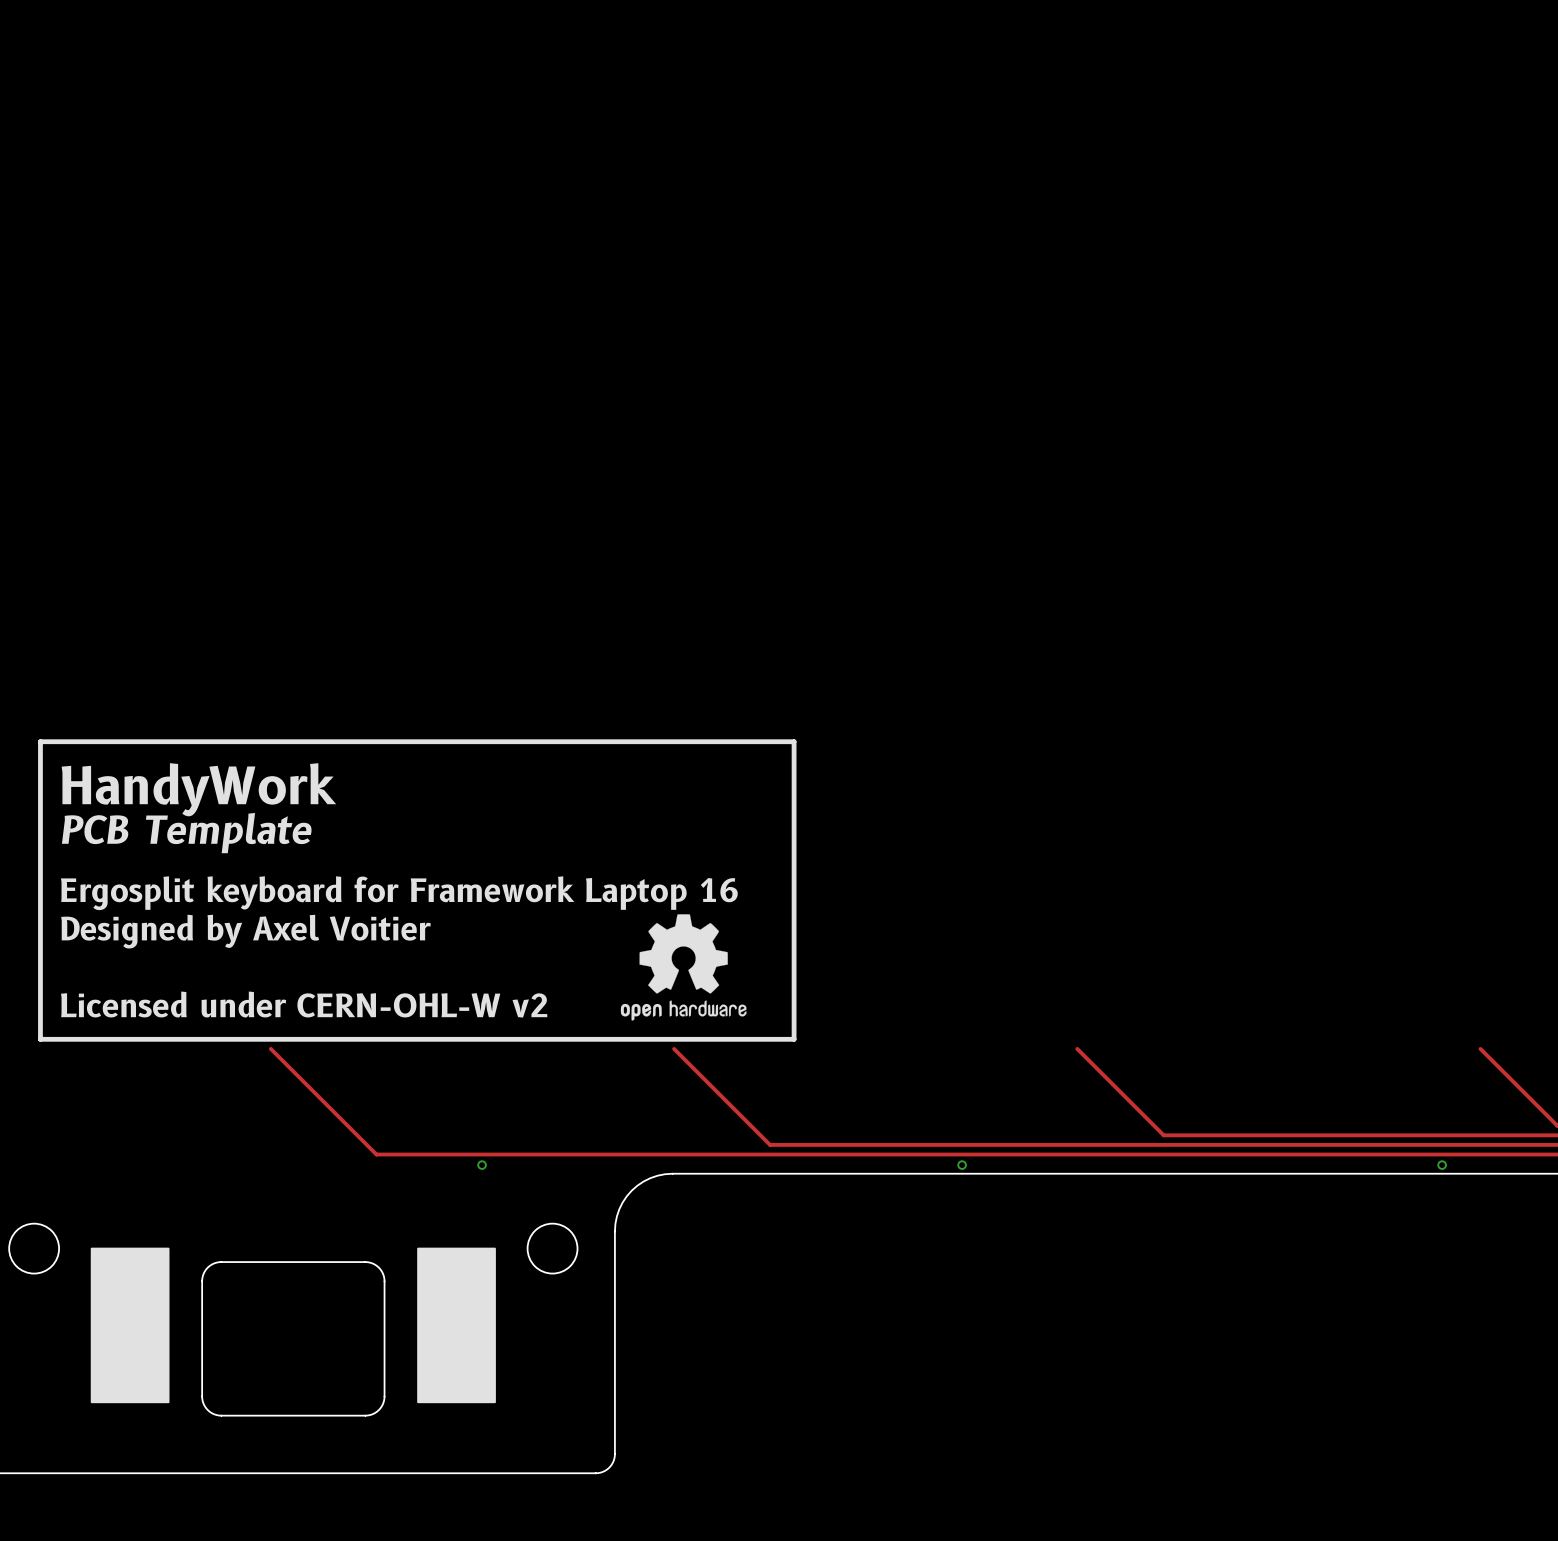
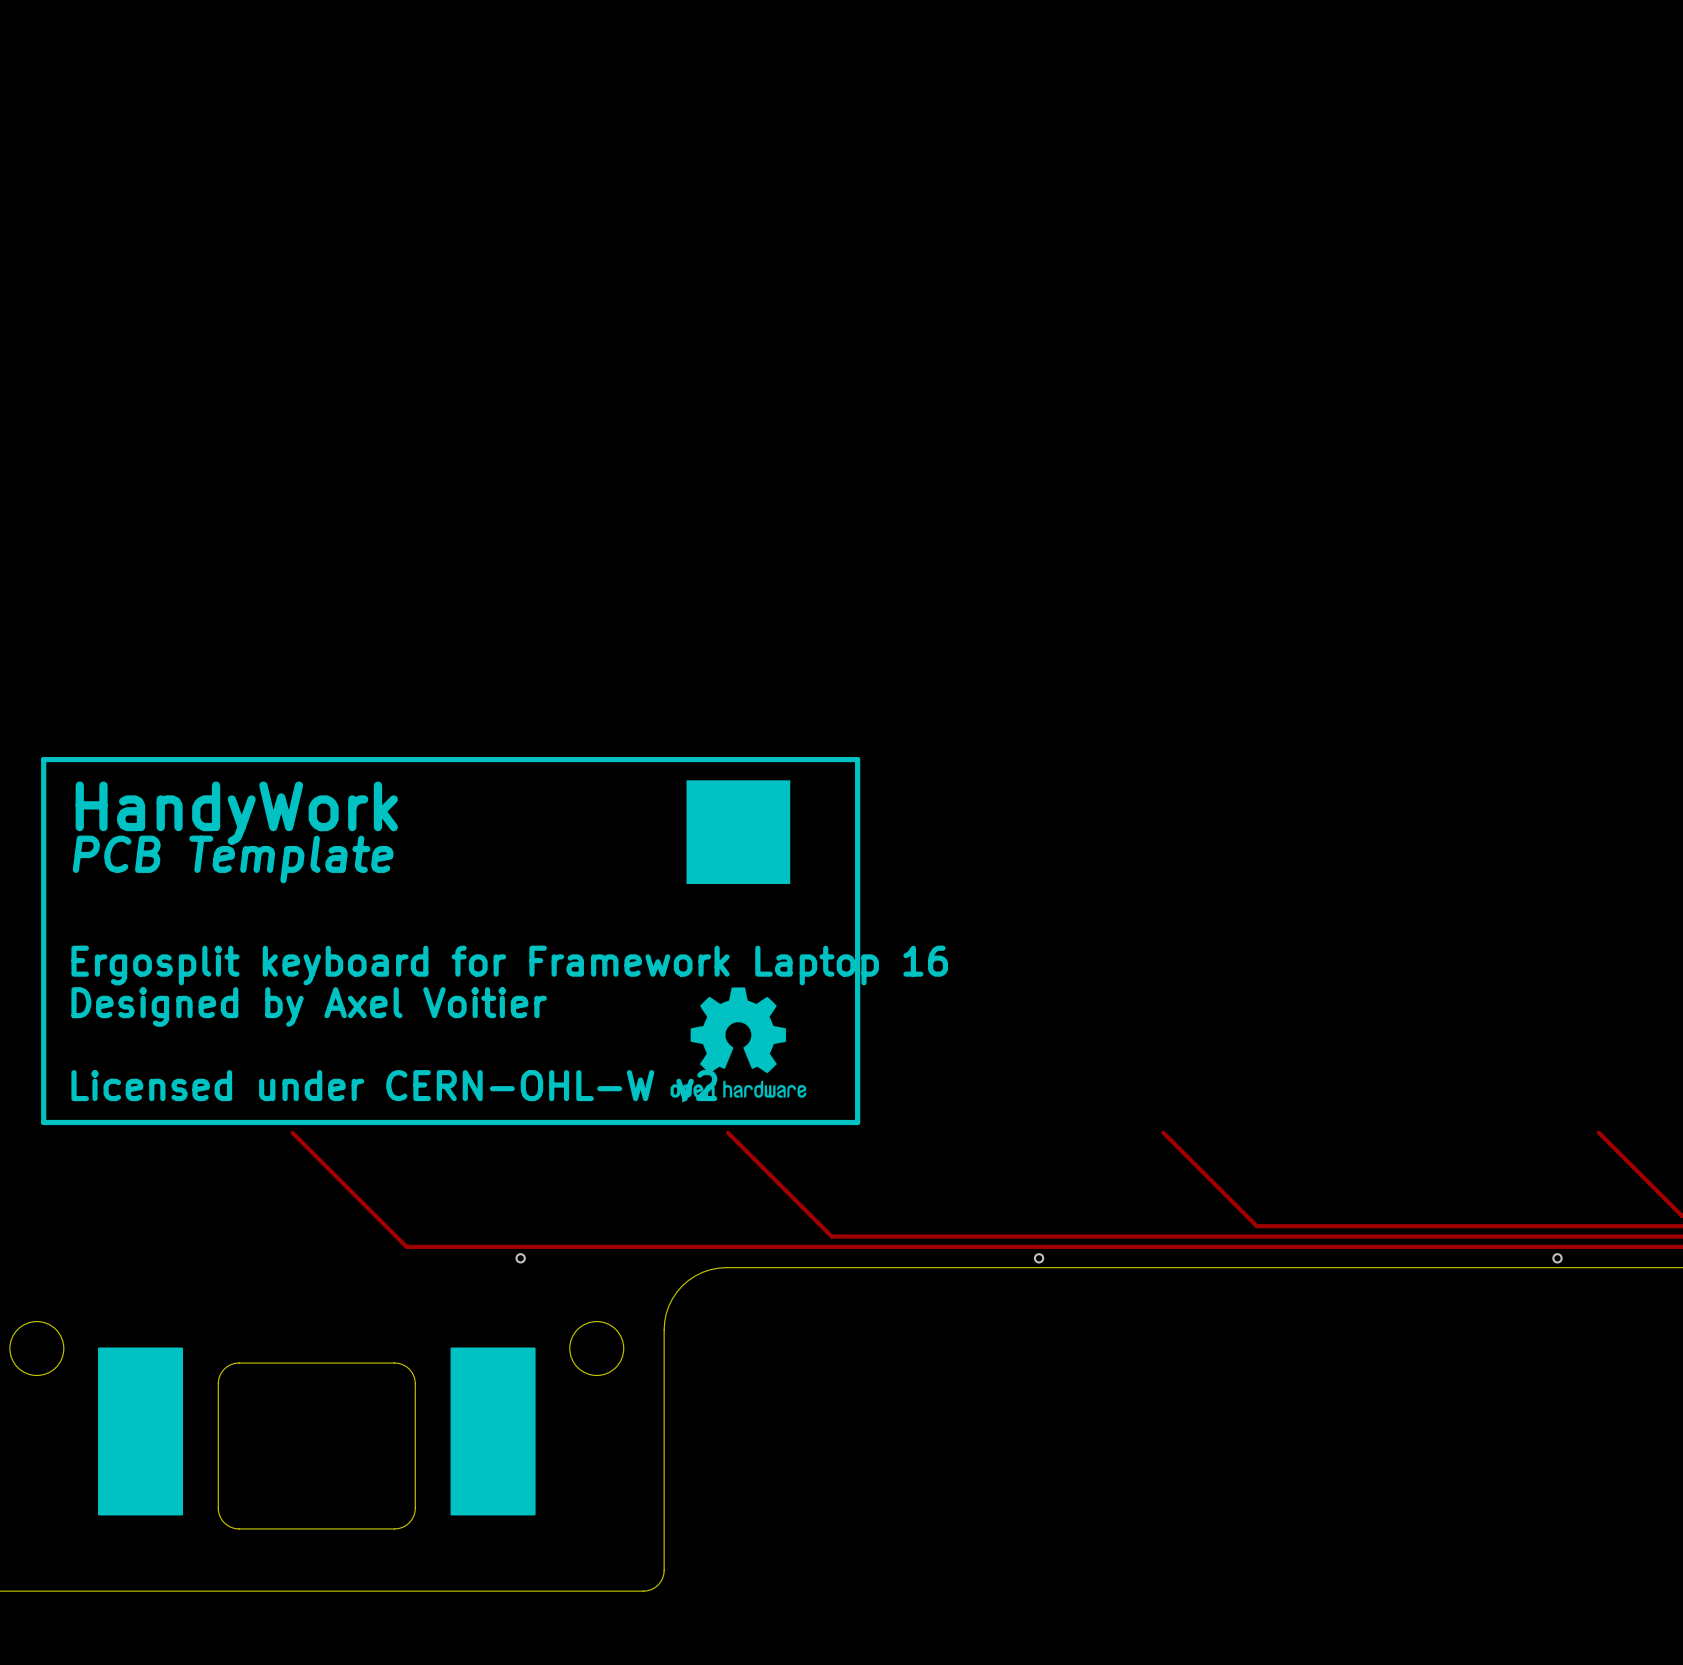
drawing: none -> [686, 780, 791, 885]
line: (794, 741) (40, 741) -> (857, 801) (857, 759) (43, 759) (43, 801)
text: none -> HandyWork (236, 813)
text: HandyWork (198, 789) -> PCB Template (233, 859)
text: PCB Template (186, 833) -> none

